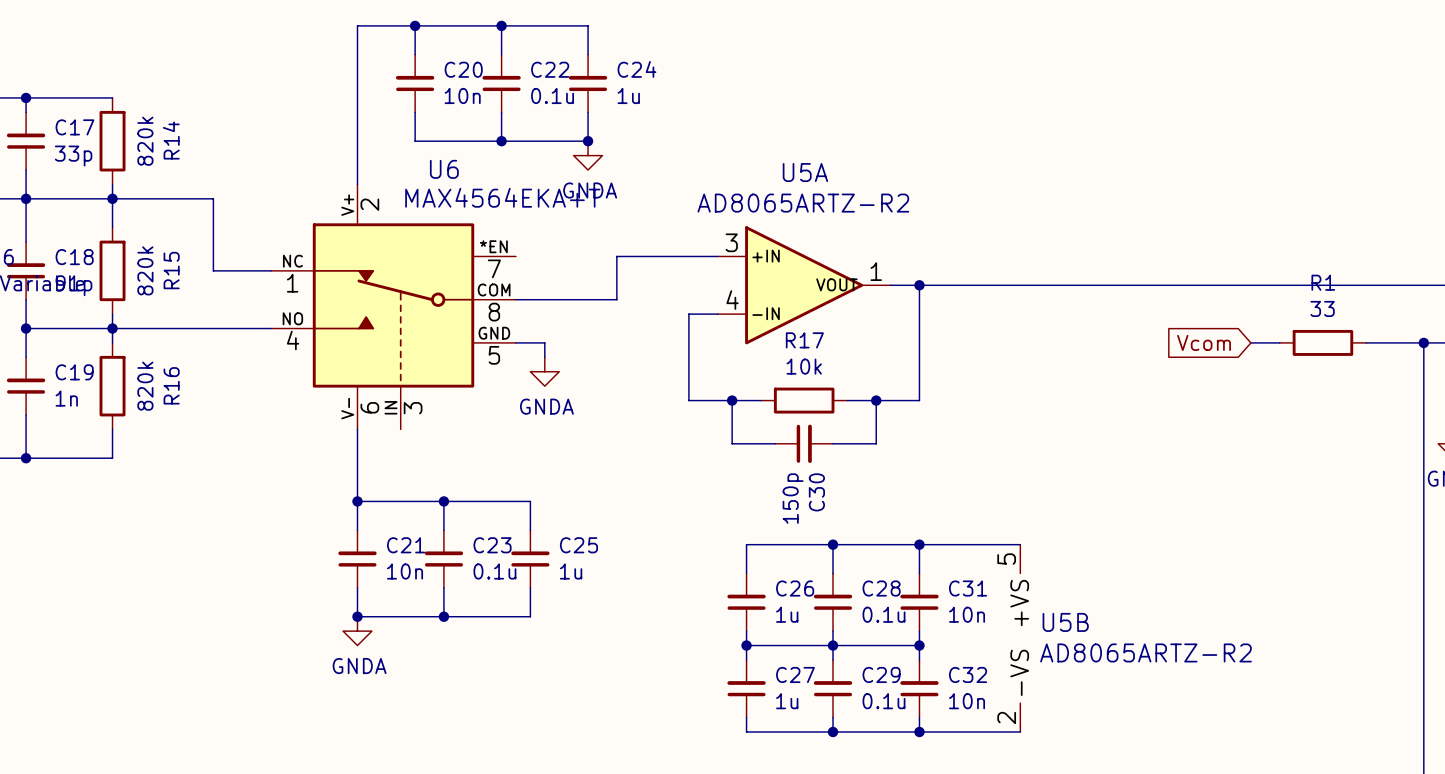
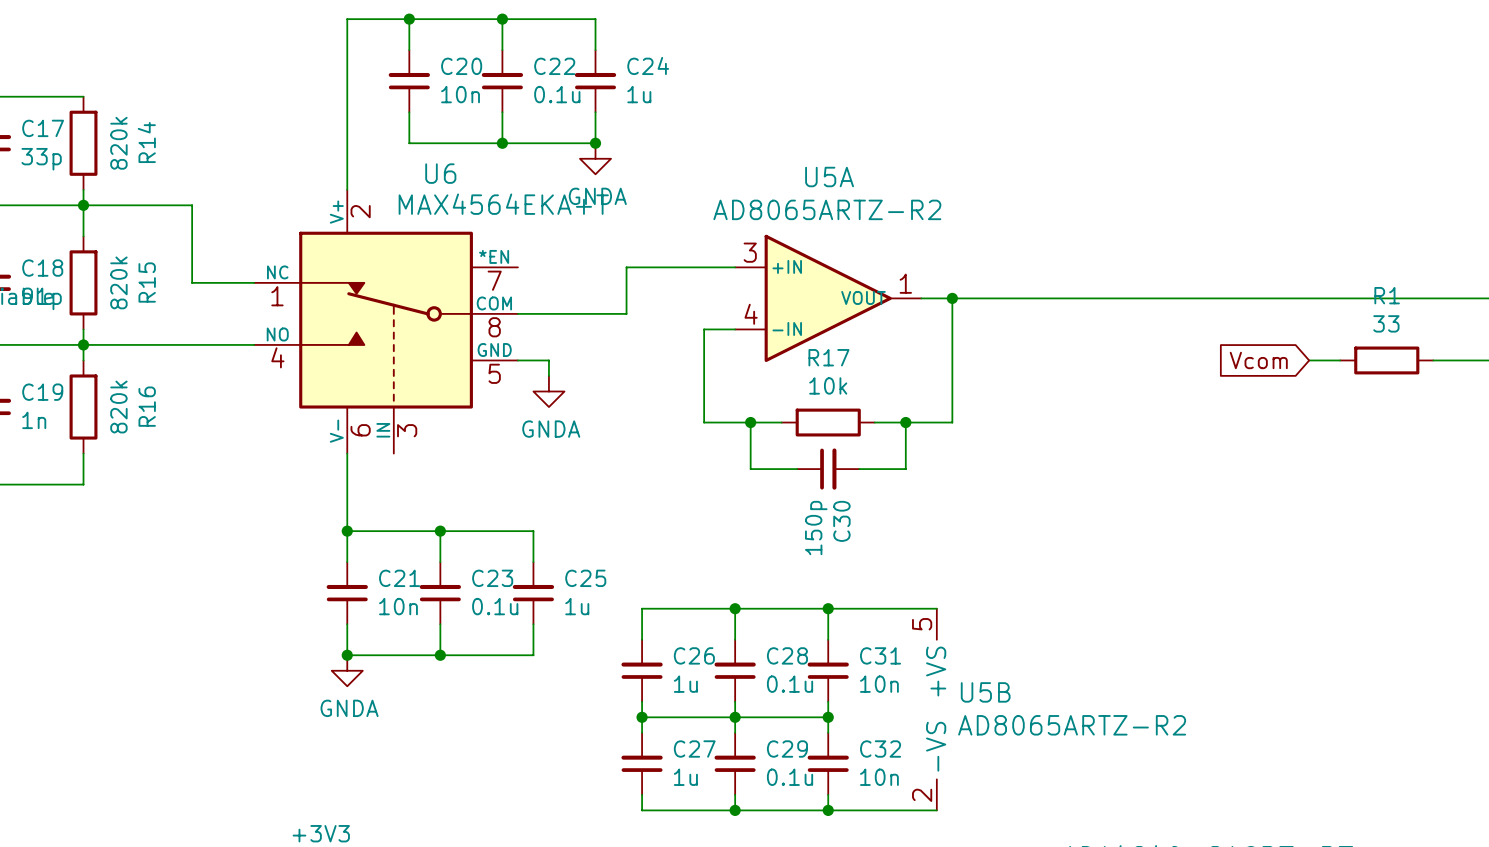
wire: (833, 544) (833, 573) -> (735, 608) (735, 639)
junction: (833, 544) -> none
wire: (919, 544) (919, 573) -> (828, 608) (828, 639)
junction: (919, 544) -> none
wire: (1020, 544) (746, 544) (746, 573) -> (936, 608) (642, 608) (642, 639)
junction: none -> (735, 608)
junction: none -> (828, 608)
C26 position: (746, 602) -> (642, 670)
C28 position: (833, 602) -> (735, 670)
C31 position: (919, 602) -> (828, 670)
wire: (746, 631) (746, 659) -> (642, 701) (642, 732)
wire: (833, 631) (833, 659) -> (735, 701) (735, 732)
wire: (919, 631) (919, 659) -> (828, 701) (828, 732)
U5B position: (1020, 638) -> (936, 709)
wire: (746, 645) (919, 645) -> (642, 717) (828, 717)
junction: (746, 645) -> none
junction: (833, 645) -> none
junction: (919, 645) -> none
junction: none -> (642, 717)
junction: none -> (735, 717)
junction: none -> (828, 717)
C27 position: (746, 688) -> (642, 763)
C29 position: (833, 688) -> (735, 763)
C32 position: (919, 688) -> (828, 763)
wire: (746, 717) (746, 732) (1020, 732) -> (642, 794) (642, 810) (936, 810)
wire: (833, 717) (833, 732) -> (735, 794) (735, 810)
wire: (919, 717) (919, 732) -> (828, 794) (828, 810)
junction: (833, 732) -> none
junction: (919, 732) -> none
junction: none -> (735, 810)
junction: none -> (828, 810)

